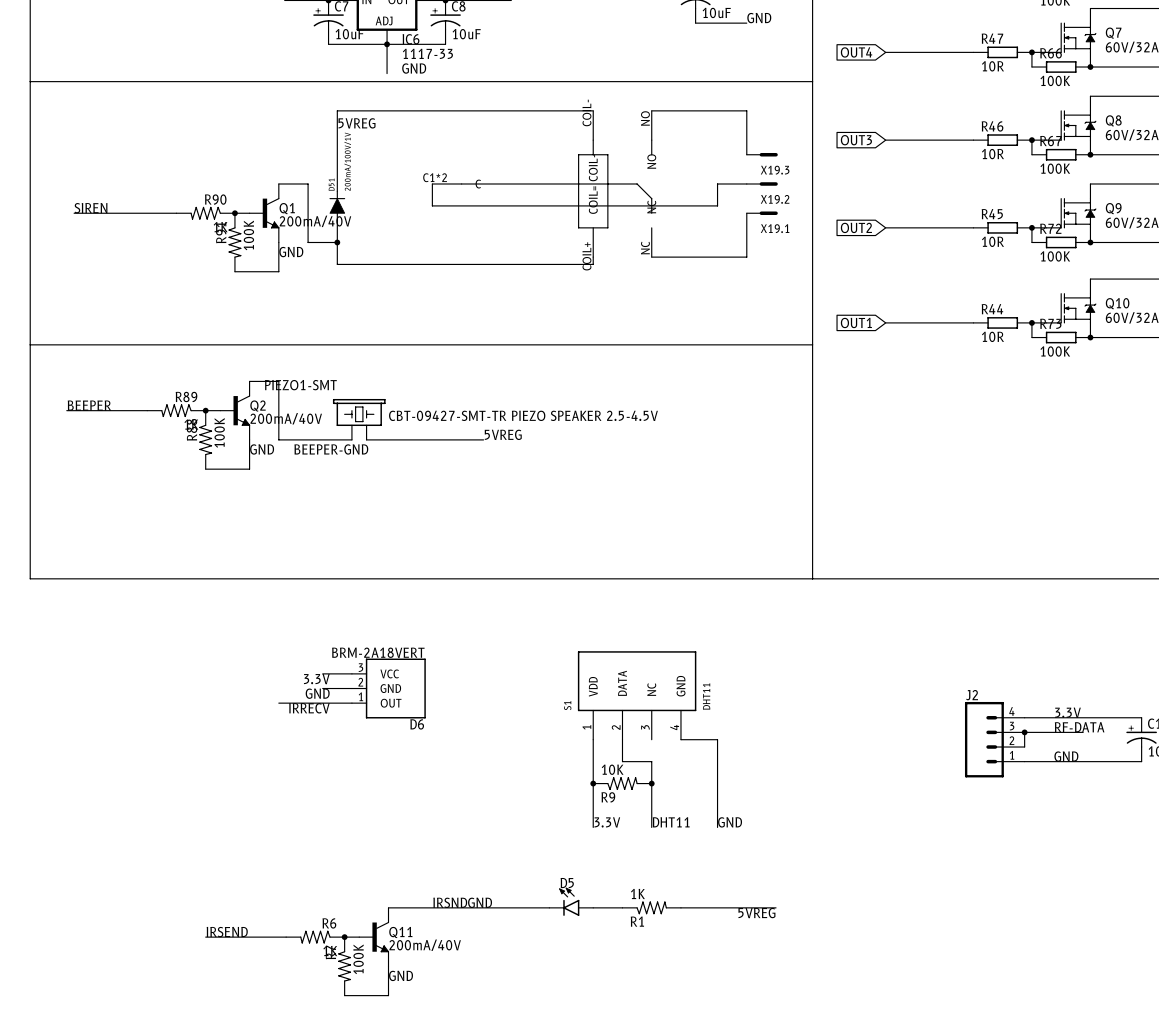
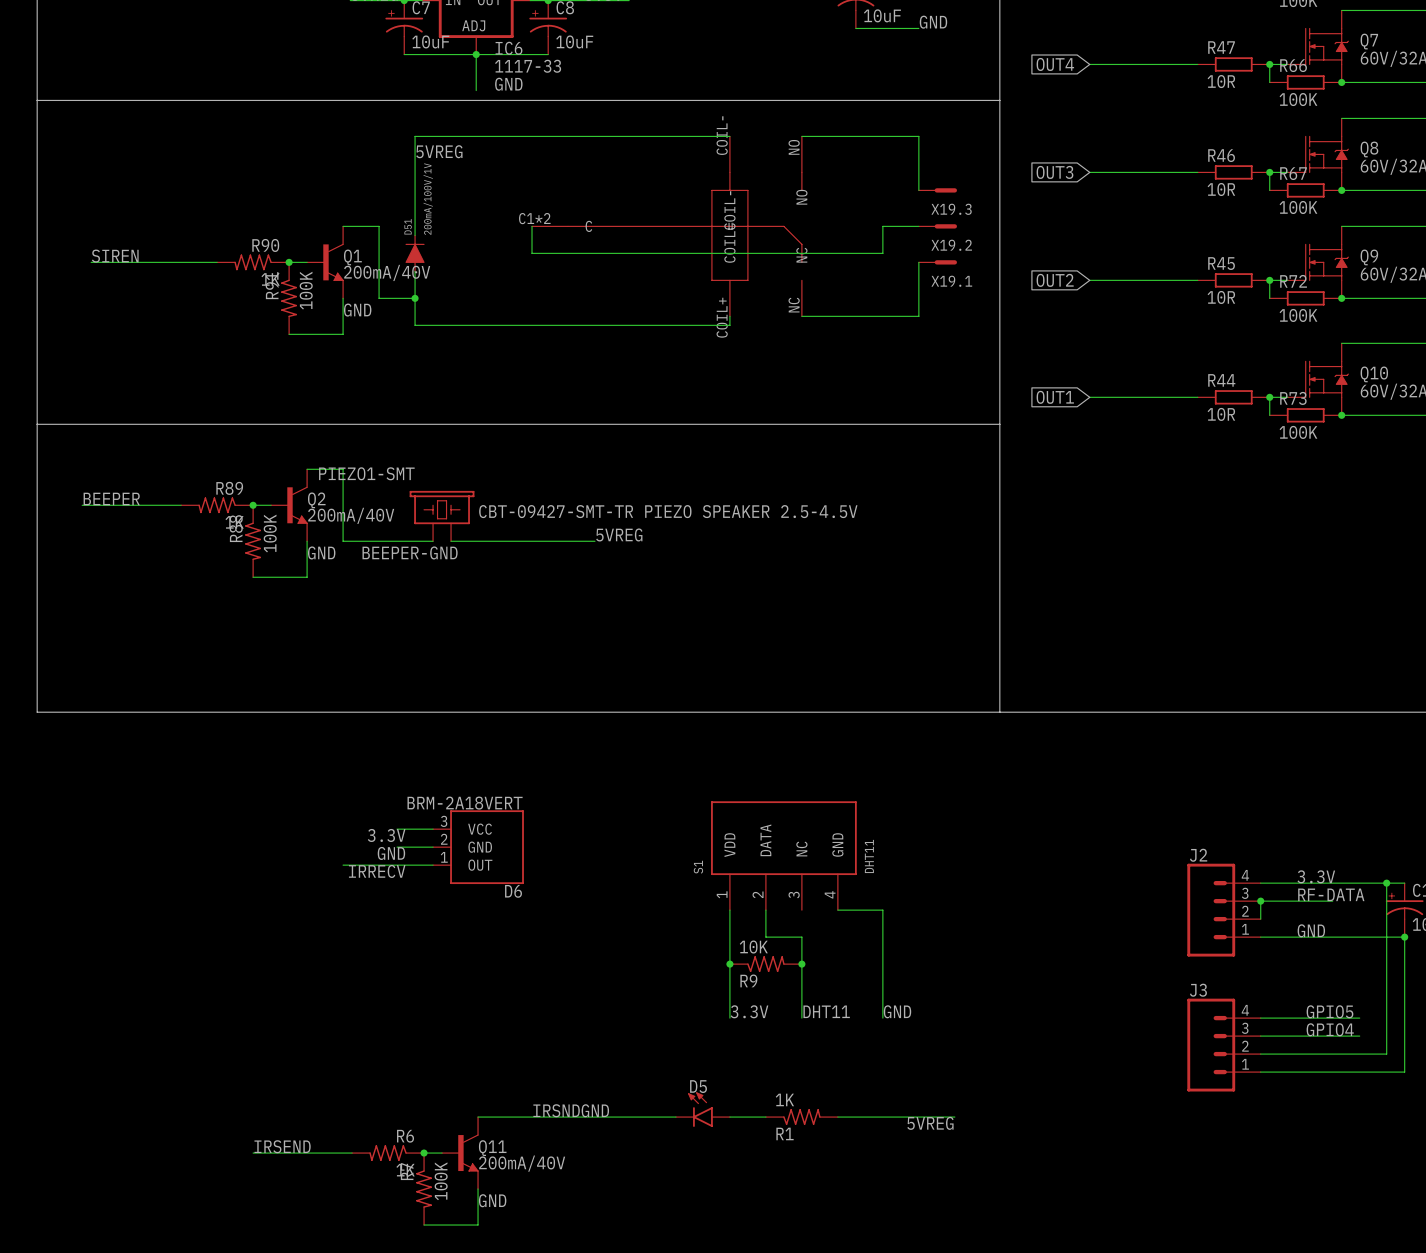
wire: none -> (1386, 883) (1386, 1054) (1260, 1054)
junction: none -> (1386, 883)
wire: none -> (1404, 937) (1404, 1072) (1260, 1072)
junction: none -> (1404, 937)
label: none -> GPIO5 (1329, 1011)
wire: none -> (1260, 1018) (1359, 1018)
label: none -> GPIO4 (1330, 1029)
wire: none -> (1260, 1036) (1359, 1036)
J3: none -> (1224, 1045)

